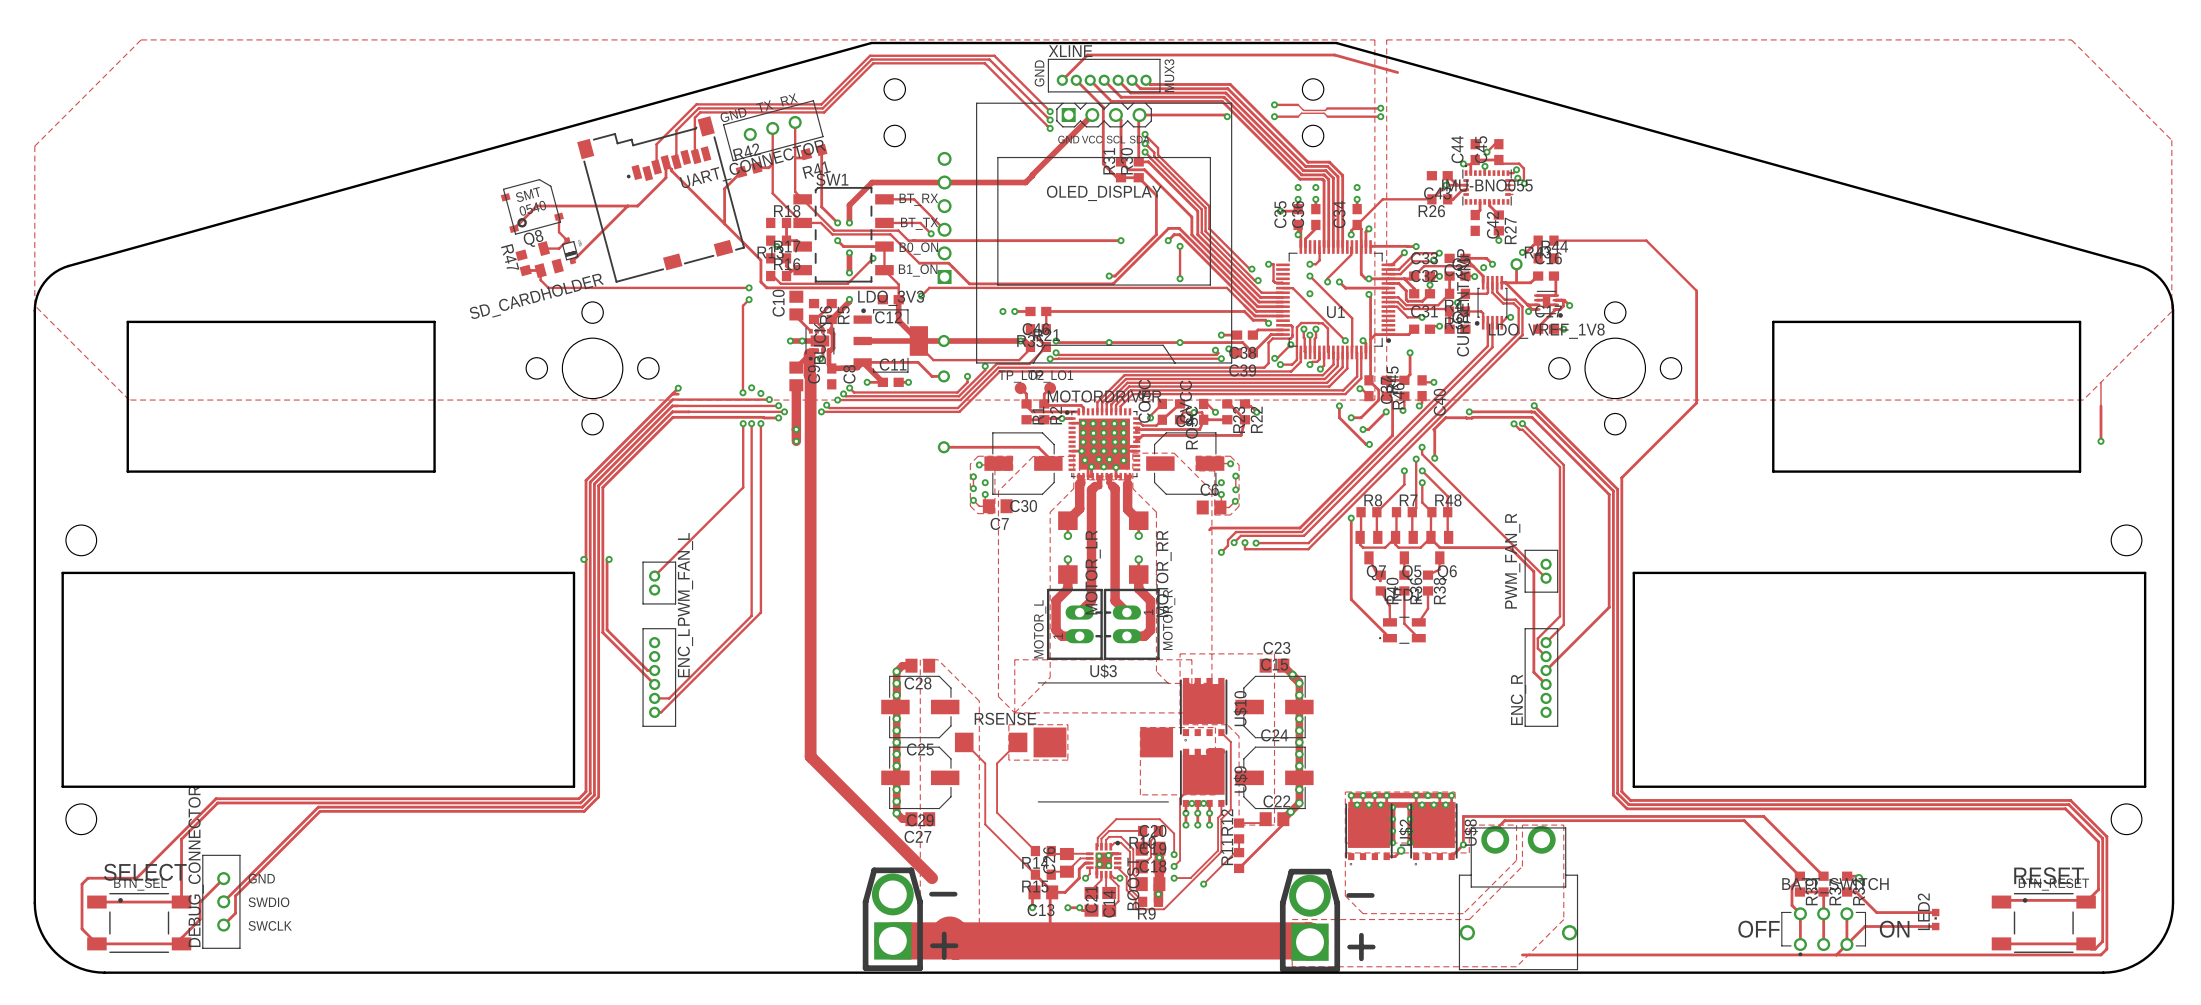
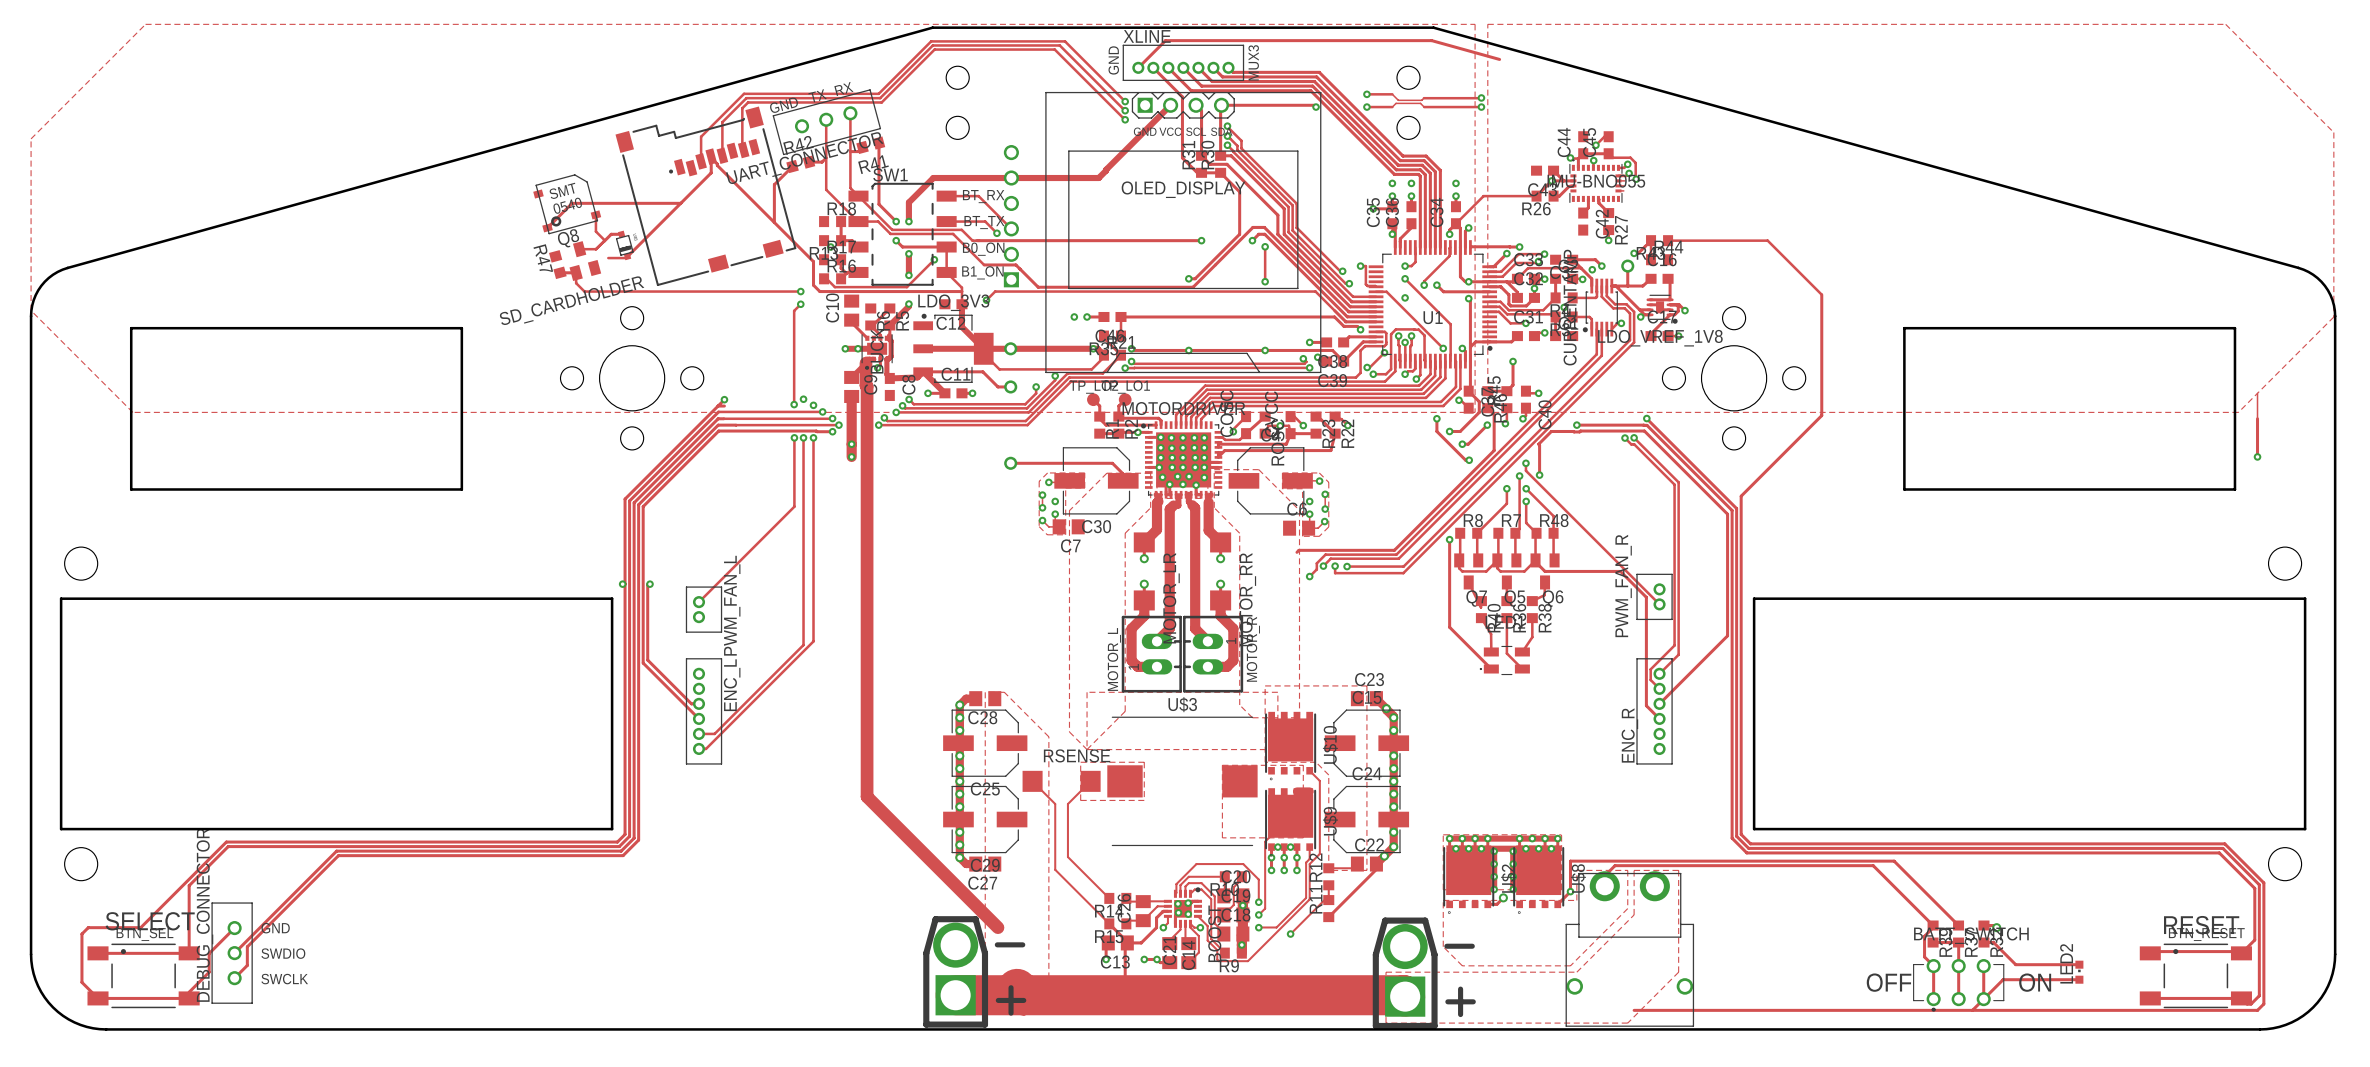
track: (627, 206) (571, 262) -> none
track: none -> (680, 203) (626, 258) (608, 258)
track: none -> (621, 234) (611, 234) (596, 249)
part position: (570, 250) -> (624, 245)

